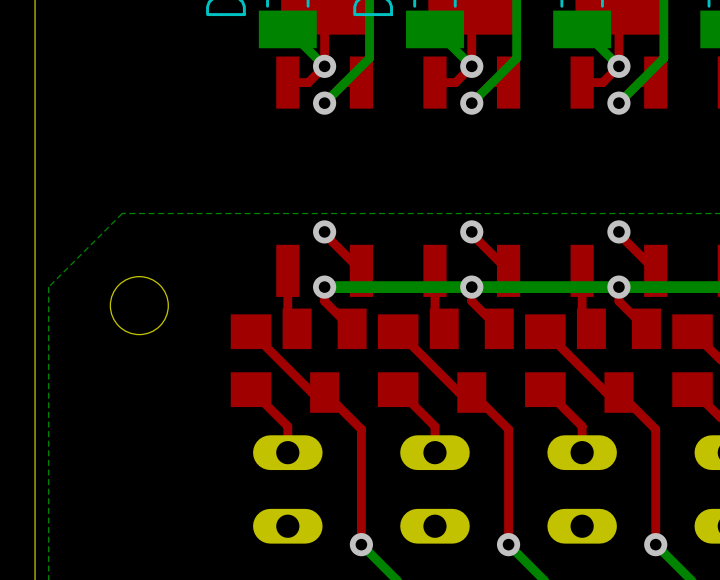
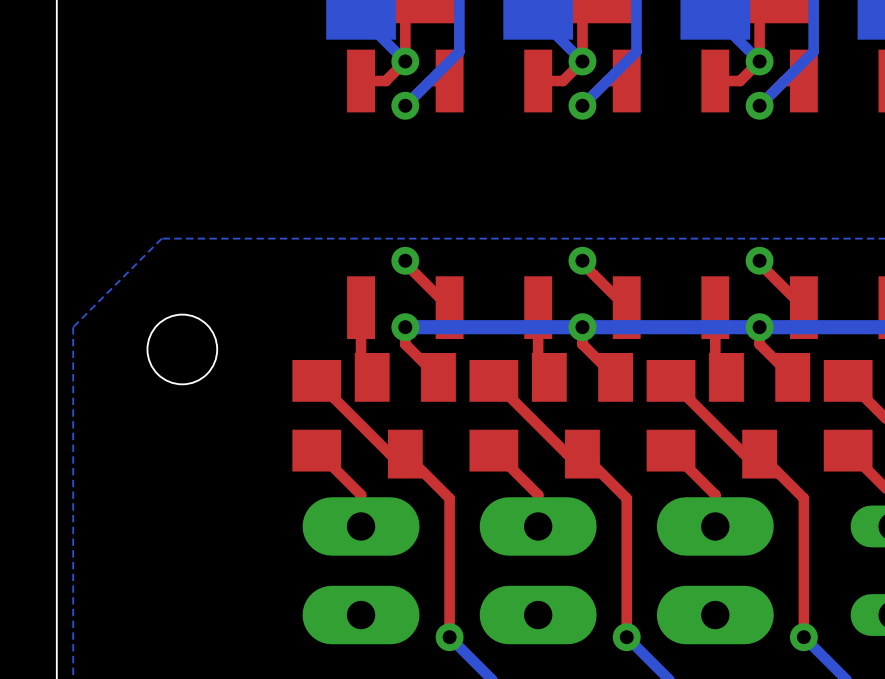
part footprint: [253, 435, 323, 544] -> [302, 497, 420, 645]
part footprint: [400, 435, 470, 544] -> [479, 497, 597, 645]
part footprint: [547, 435, 617, 544] -> [656, 497, 774, 645]

